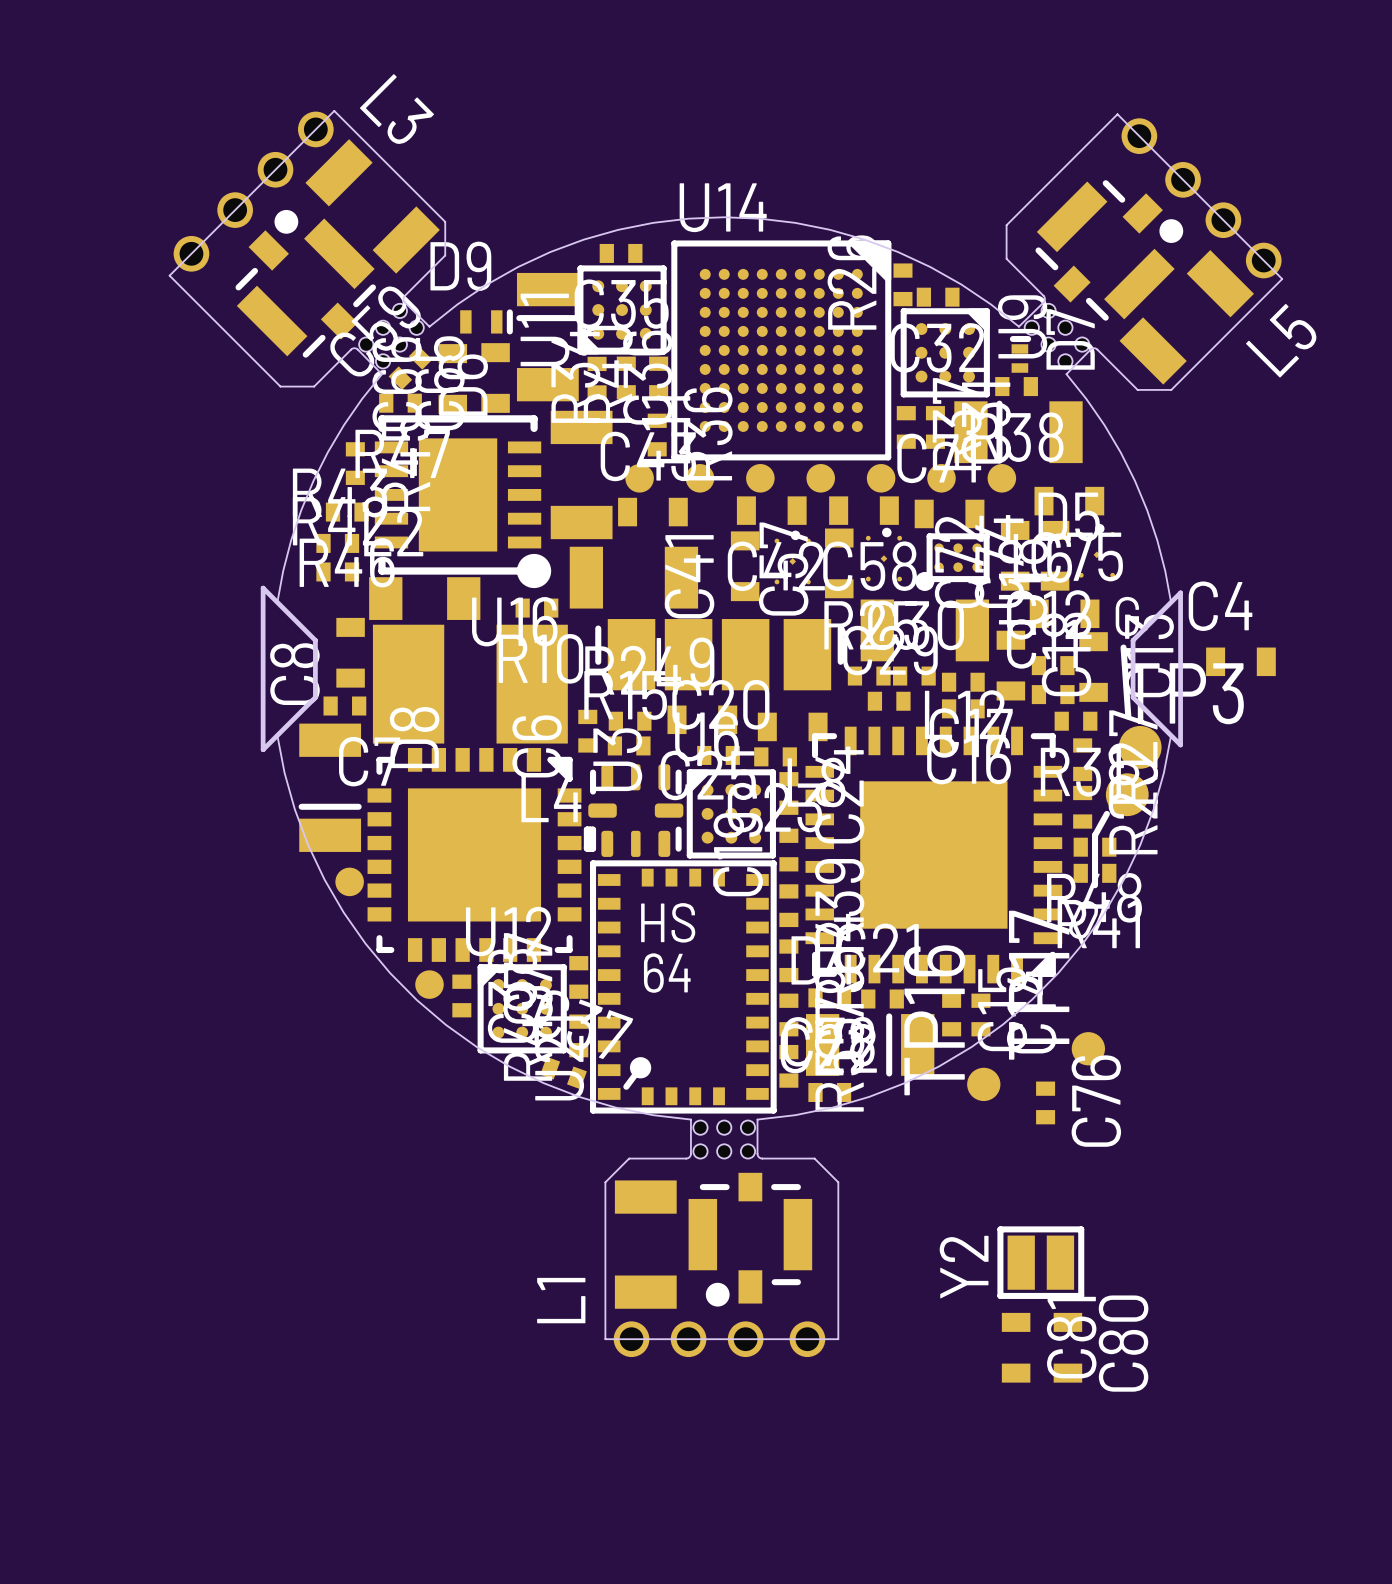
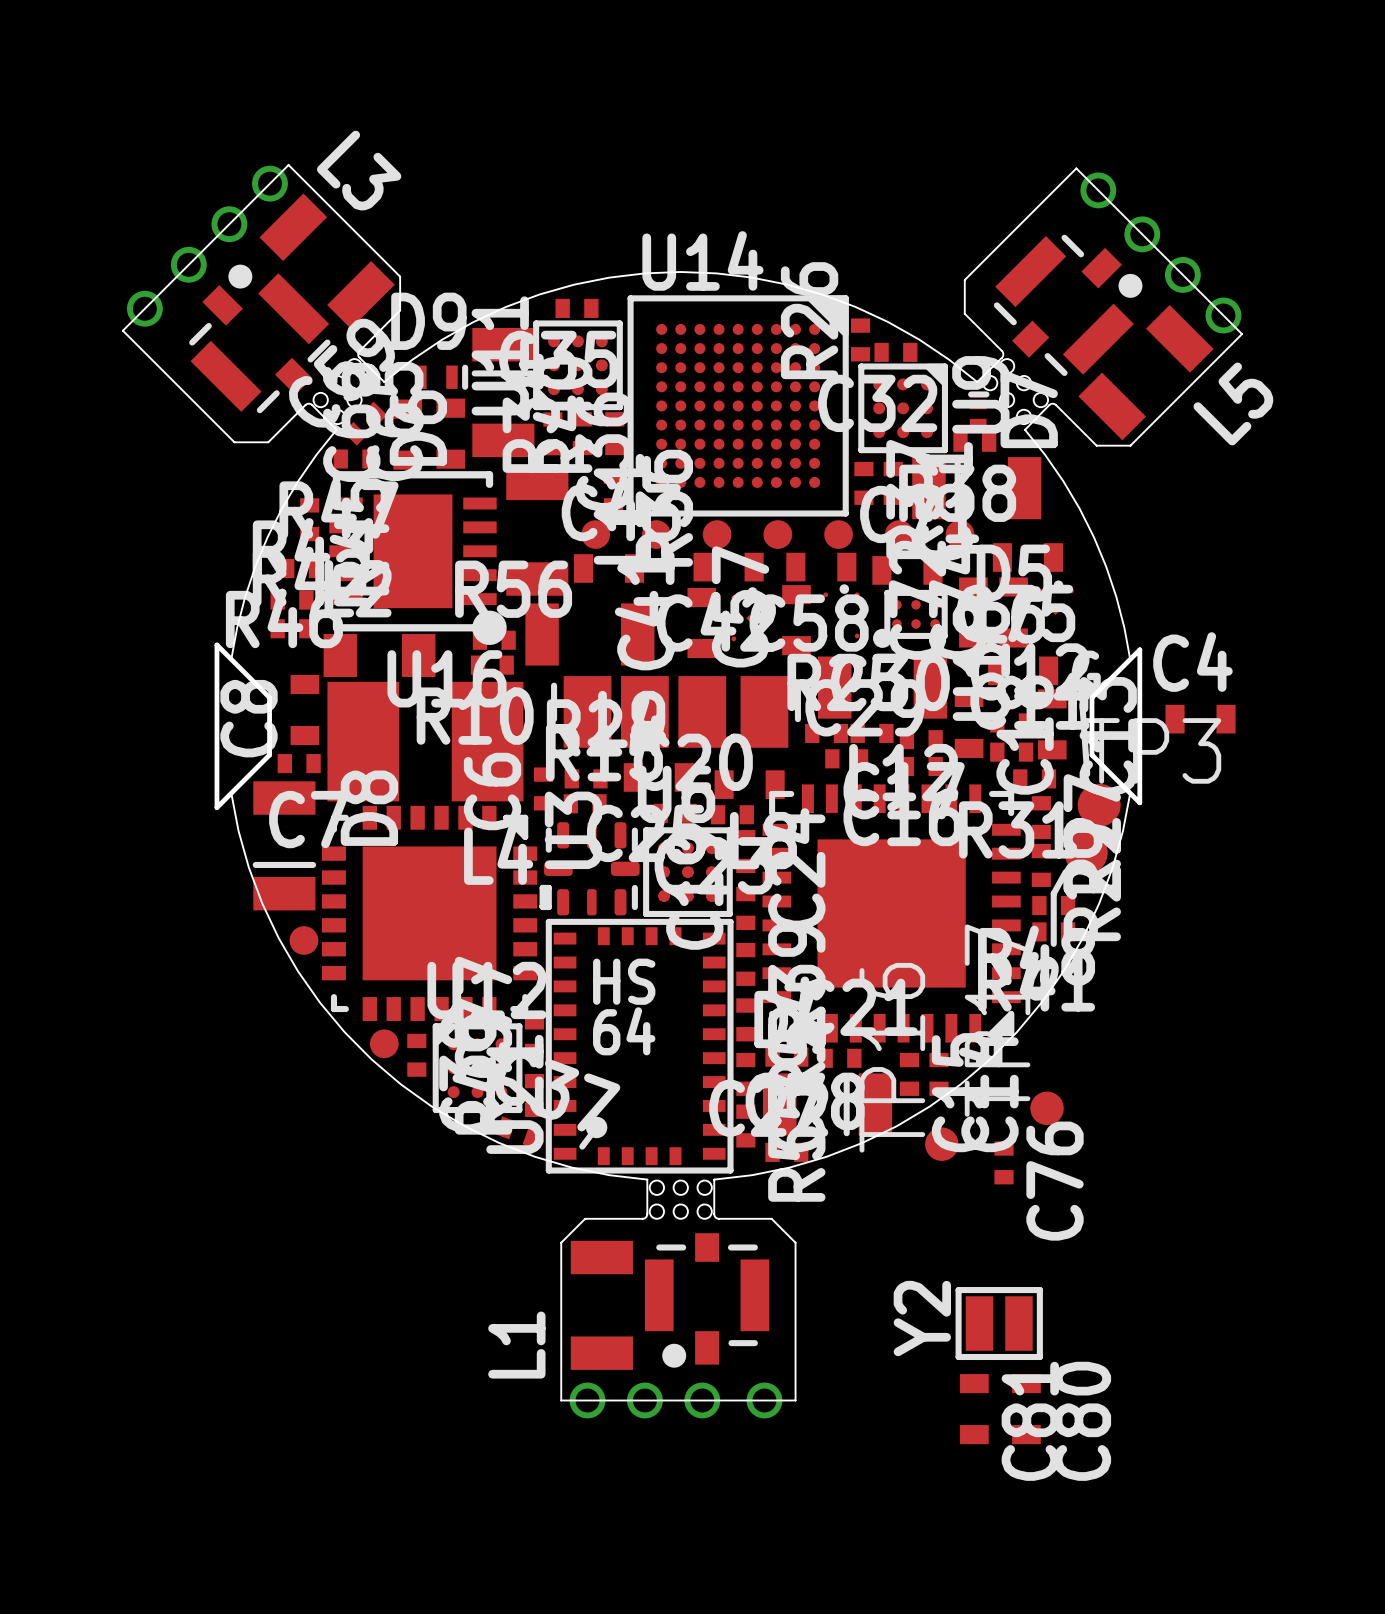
R56: none -> (494, 640)

